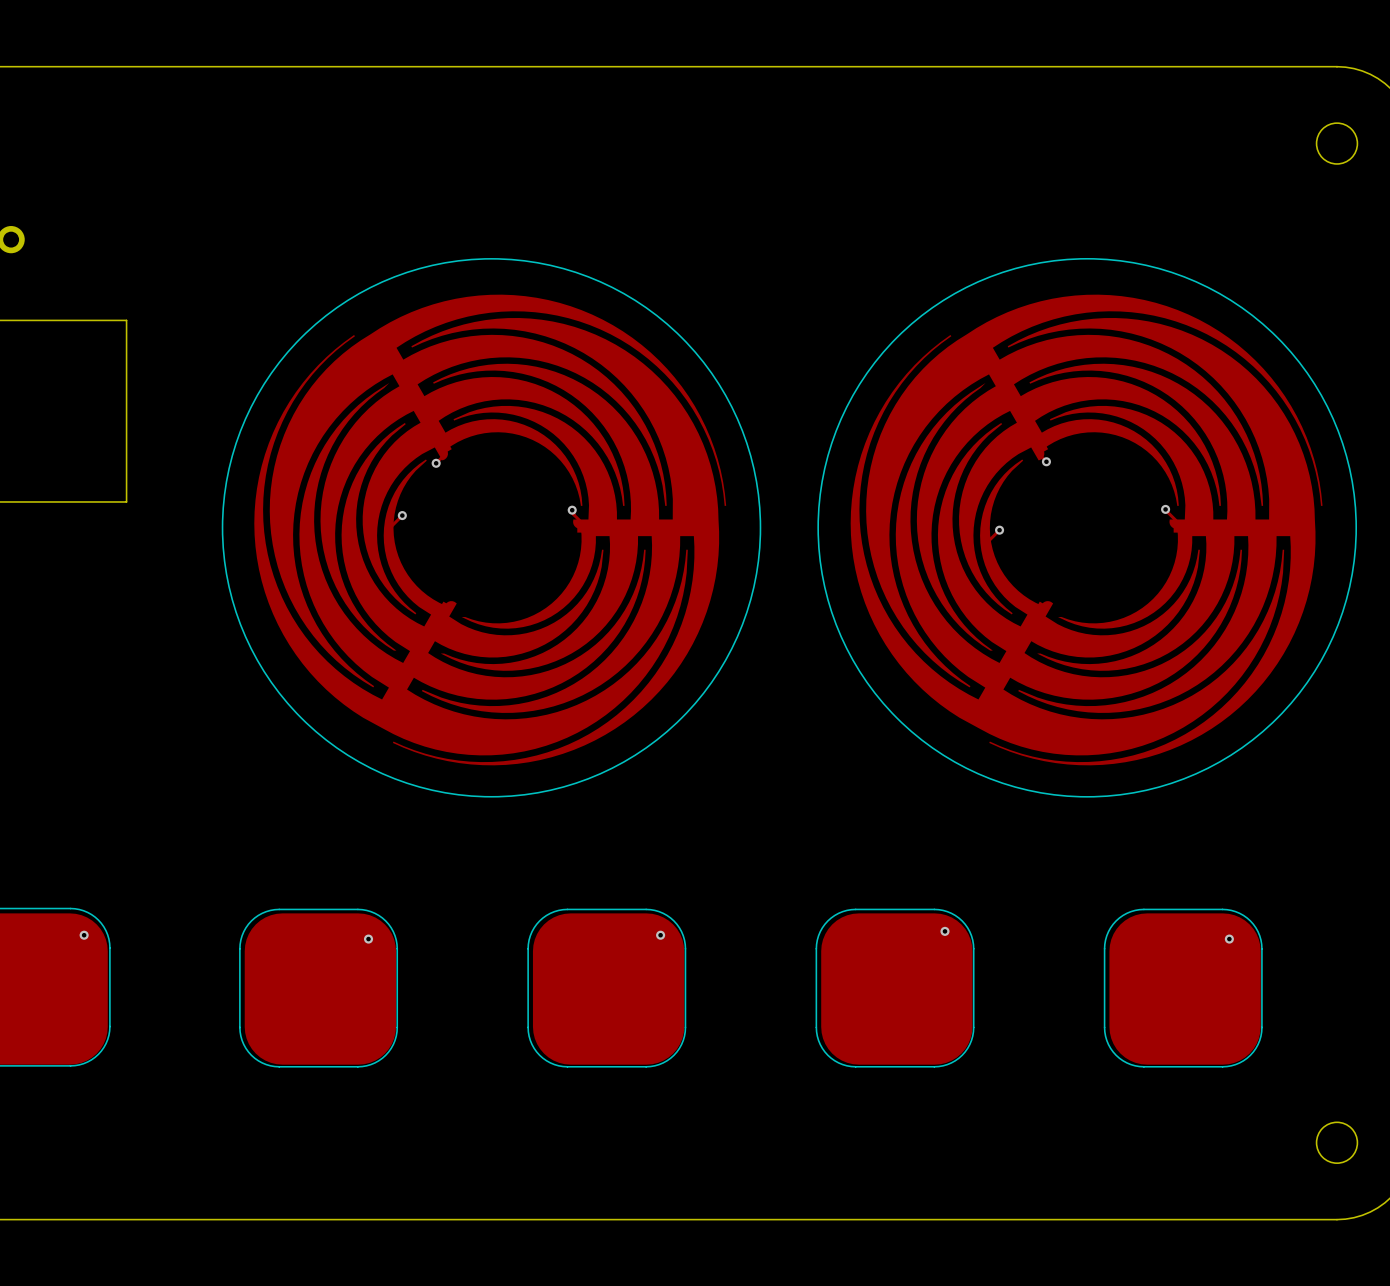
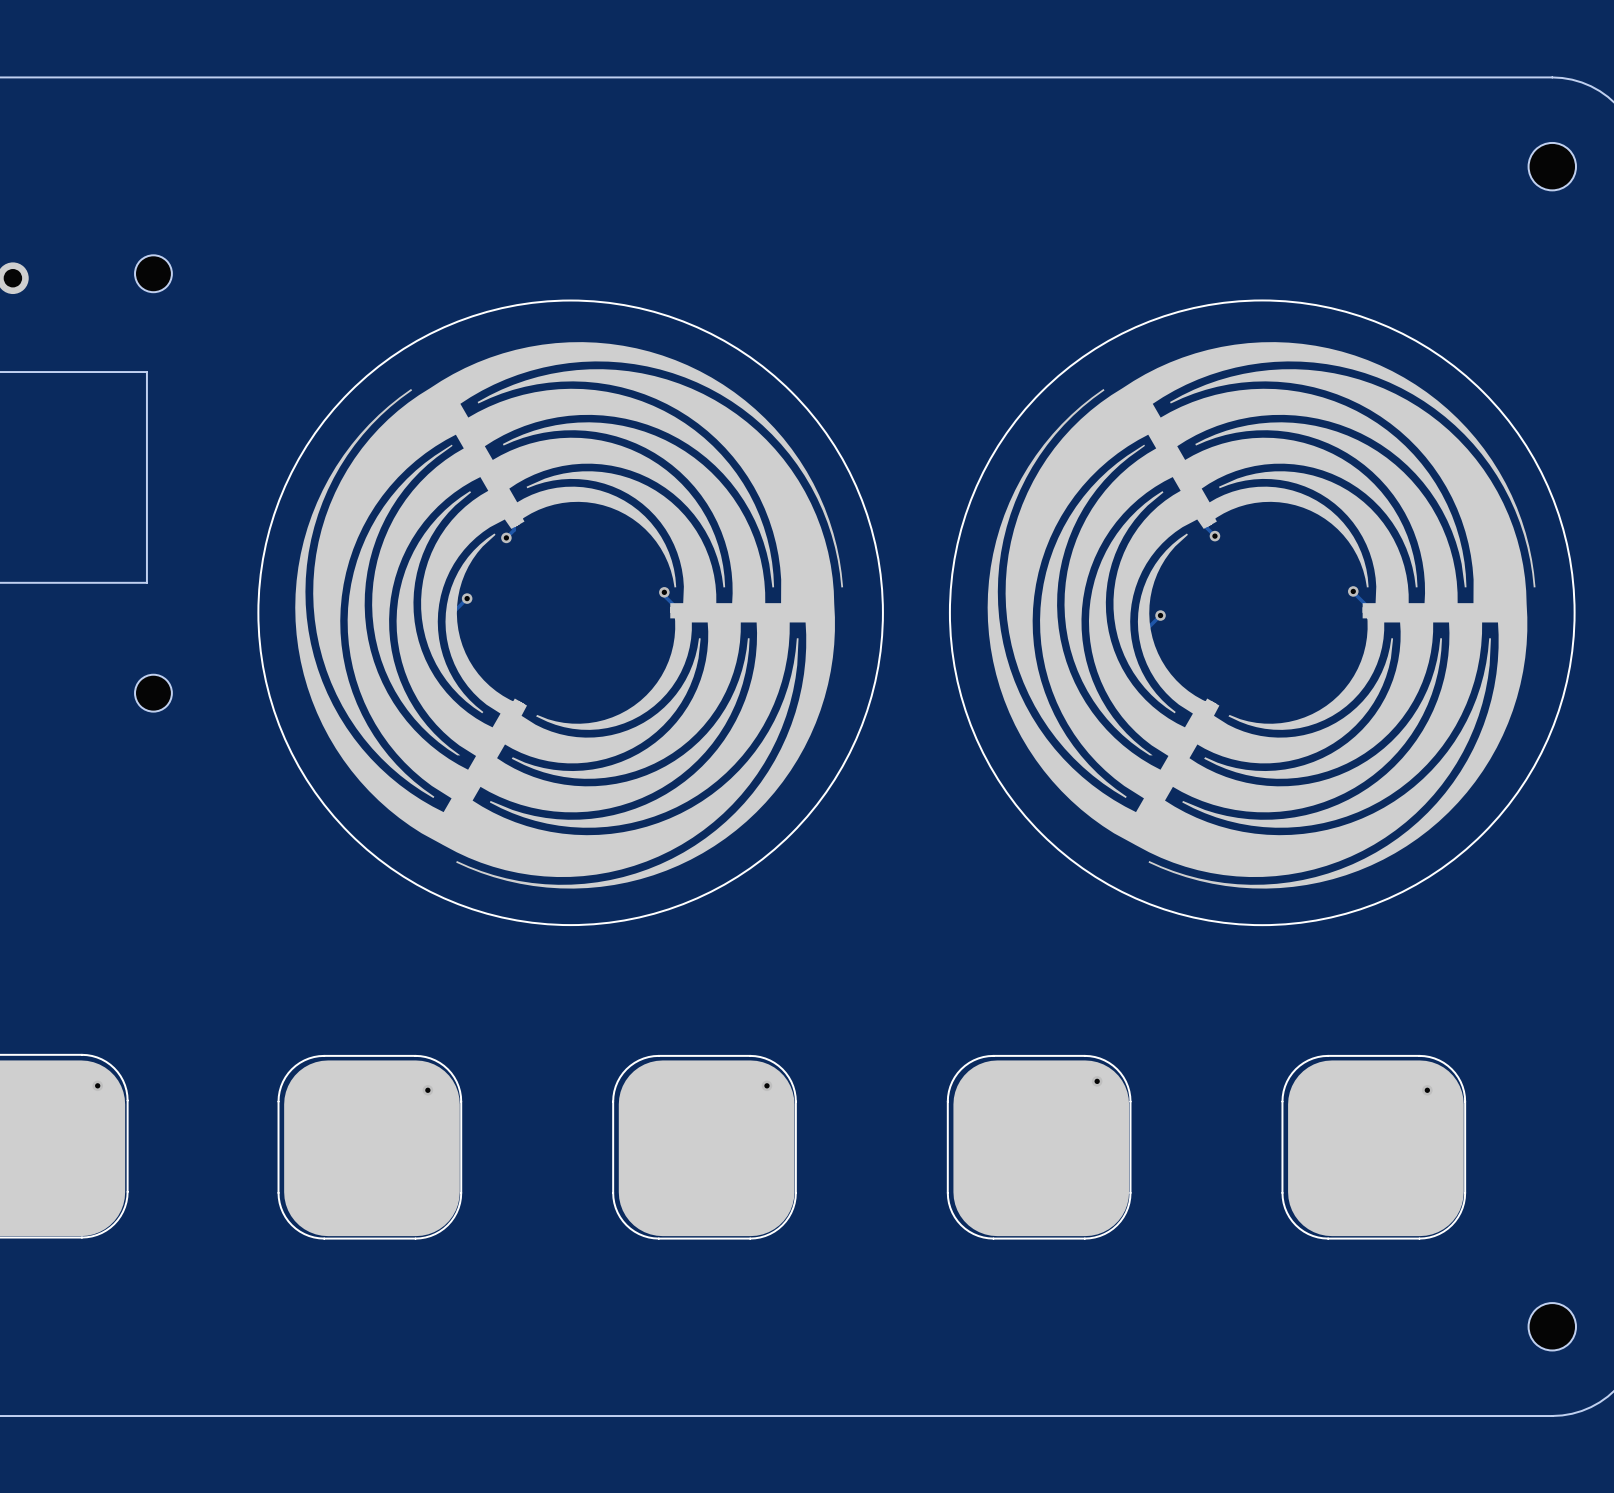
part: none -> (153, 273)
part footprint: [254, 294, 727, 766] -> [295, 342, 844, 889]
part footprint: [850, 294, 1323, 766] -> [987, 342, 1536, 889]
part: none -> (153, 693)

